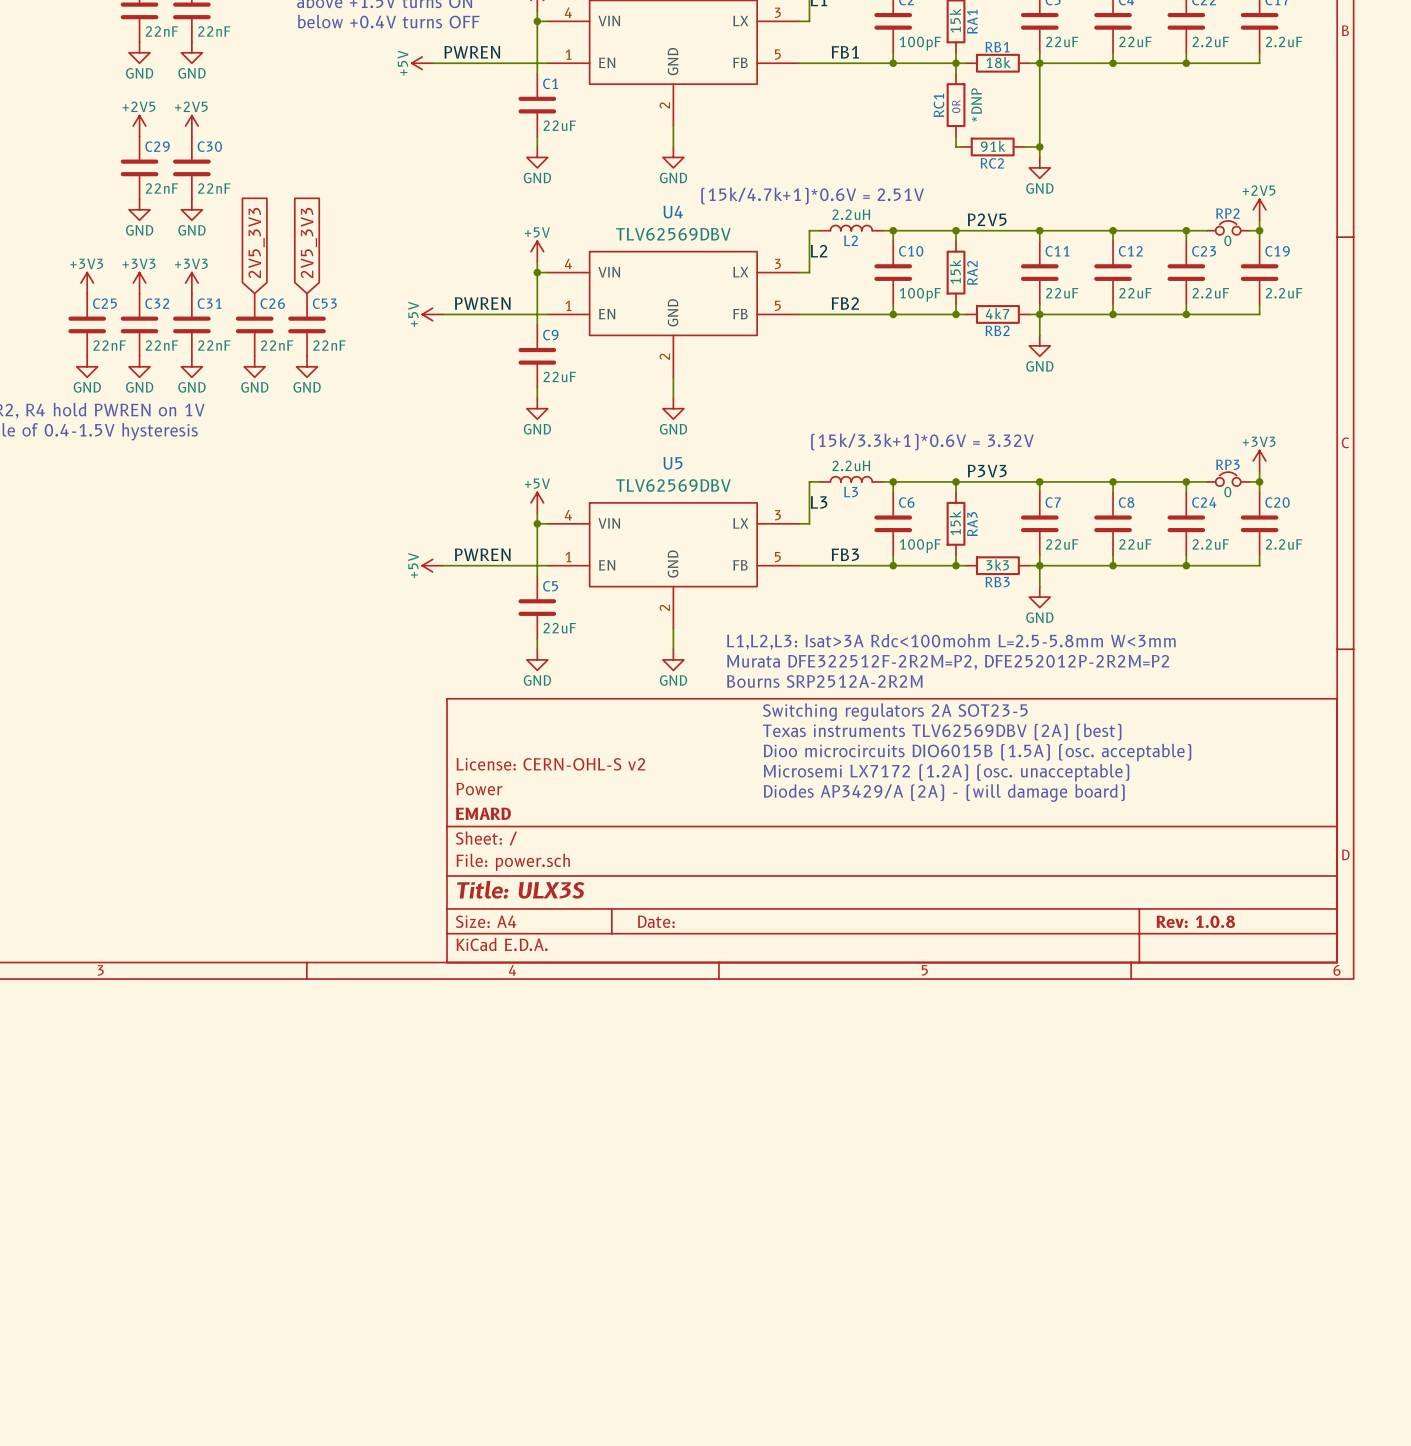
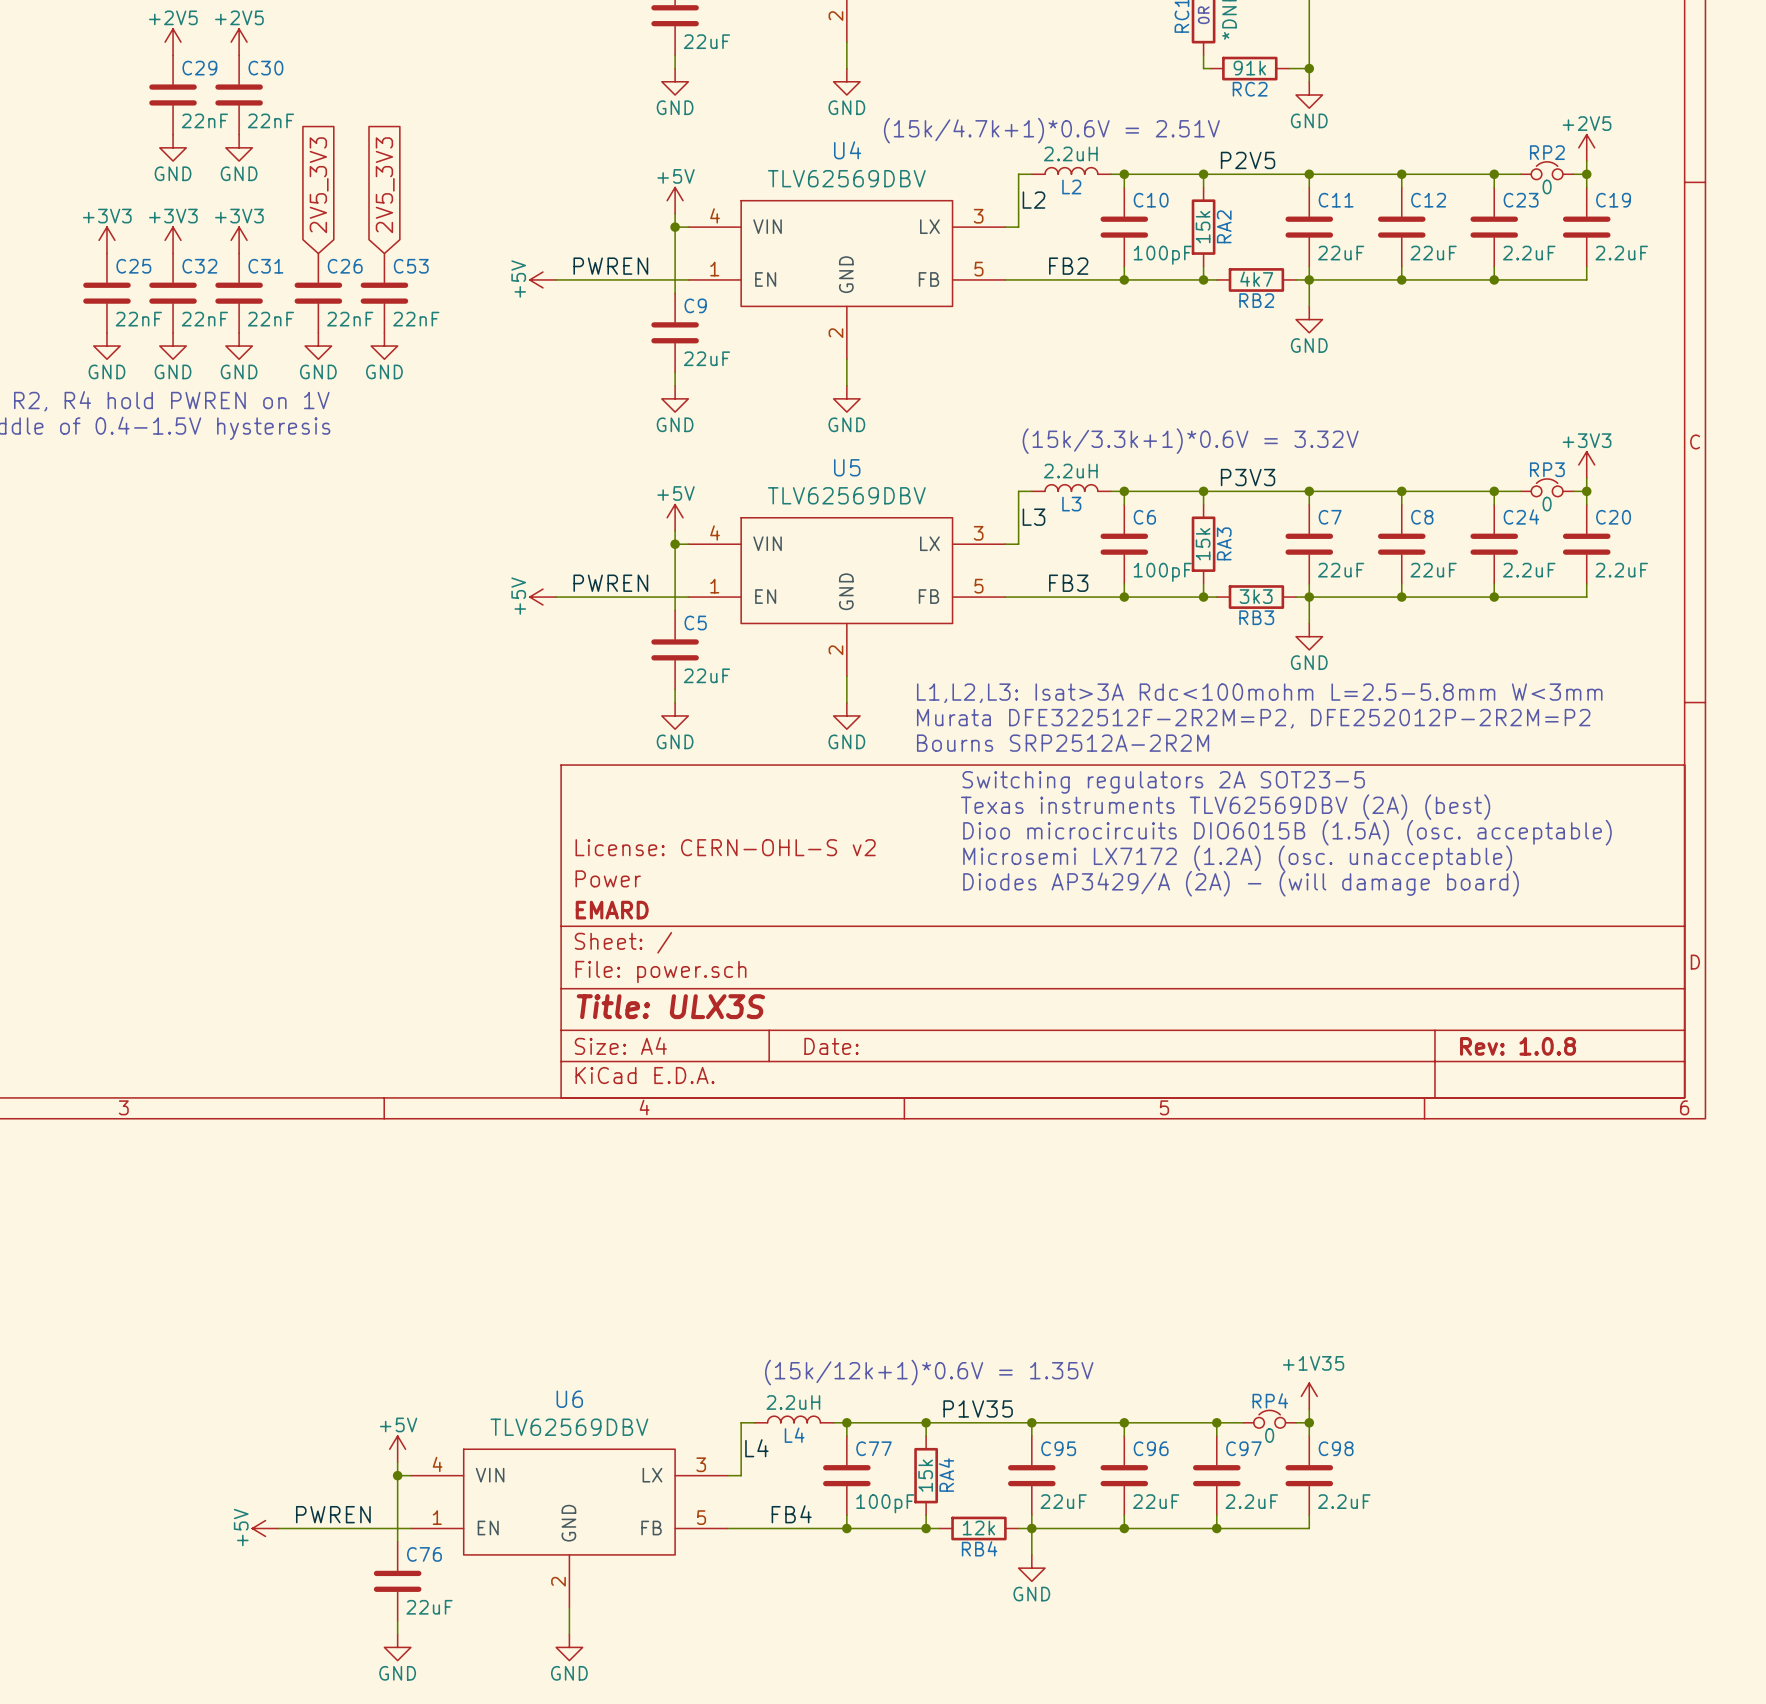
text: none -> (15k/12k+1)*0.6V = 1.35V (929, 1372)
power symbol: none -> +1V35 (1309, 1396)
label: none -> P1V35 (978, 1408)
wire: none -> (1309, 1409) (1309, 1436)
L4: none -> 2.2uH (794, 1419)
RP4: none -> 0 (1269, 1419)
wire: none -> (754, 1422) (741, 1422) (741, 1475) (727, 1475)
wire: none -> (833, 1422) (1243, 1422)
wire: none -> (846, 1422) (846, 1436)
junction: none -> (846, 1422)
wire: none -> (926, 1422) (926, 1436)
junction: none -> (926, 1422)
wire: none -> (1031, 1422) (1031, 1436)
junction: none -> (1031, 1422)
wire: none -> (1124, 1422) (1124, 1436)
junction: none -> (1124, 1422)
wire: none -> (1216, 1422) (1216, 1436)
junction: none -> (1216, 1422)
wire: none -> (1296, 1422) (1309, 1422)
junction: none -> (1309, 1422)
power symbol: none -> +5V (397, 1449)
label: none -> L4 (756, 1448)
wire: none -> (397, 1462) (397, 1541)
wire: none -> (397, 1475) (410, 1475)
junction: none -> (397, 1475)
C77: none -> 100pF (846, 1475)
RA4: none -> 15k (926, 1475)
C95: none -> 22uF (1031, 1475)
C96: none -> 22uF (1124, 1475)
C97: none -> 2.2uF (1216, 1475)
C98: none -> 2.2uF (1309, 1475)
label: none -> PWREN (333, 1514)
label: none -> FB4 (791, 1514)
wire: none -> (846, 1515) (846, 1528)
wire: none -> (926, 1515) (926, 1528)
wire: none -> (1031, 1515) (1031, 1554)
wire: none -> (1124, 1515) (1124, 1528)
wire: none -> (1216, 1515) (1216, 1528)
wire: none -> (1309, 1515) (1309, 1528) (1018, 1528)
power symbol: none -> +5V (265, 1528)
wire: none -> (278, 1528) (410, 1528)
U6: none -> TLV62569DBV (569, 1528)
wire: none -> (727, 1528) (939, 1528)
junction: none -> (846, 1528)
junction: none -> (926, 1528)
RB4: none -> 12k (978, 1528)
junction: none -> (1031, 1528)
junction: none -> (1124, 1528)
junction: none -> (1216, 1528)
power symbol: none -> GND (1031, 1568)
C76: none -> 22uF (397, 1581)
wire: none -> (569, 1607) (569, 1634)
wire: none -> (397, 1620) (397, 1634)
power symbol: none -> GND (397, 1647)
power symbol: none -> GND (569, 1647)

